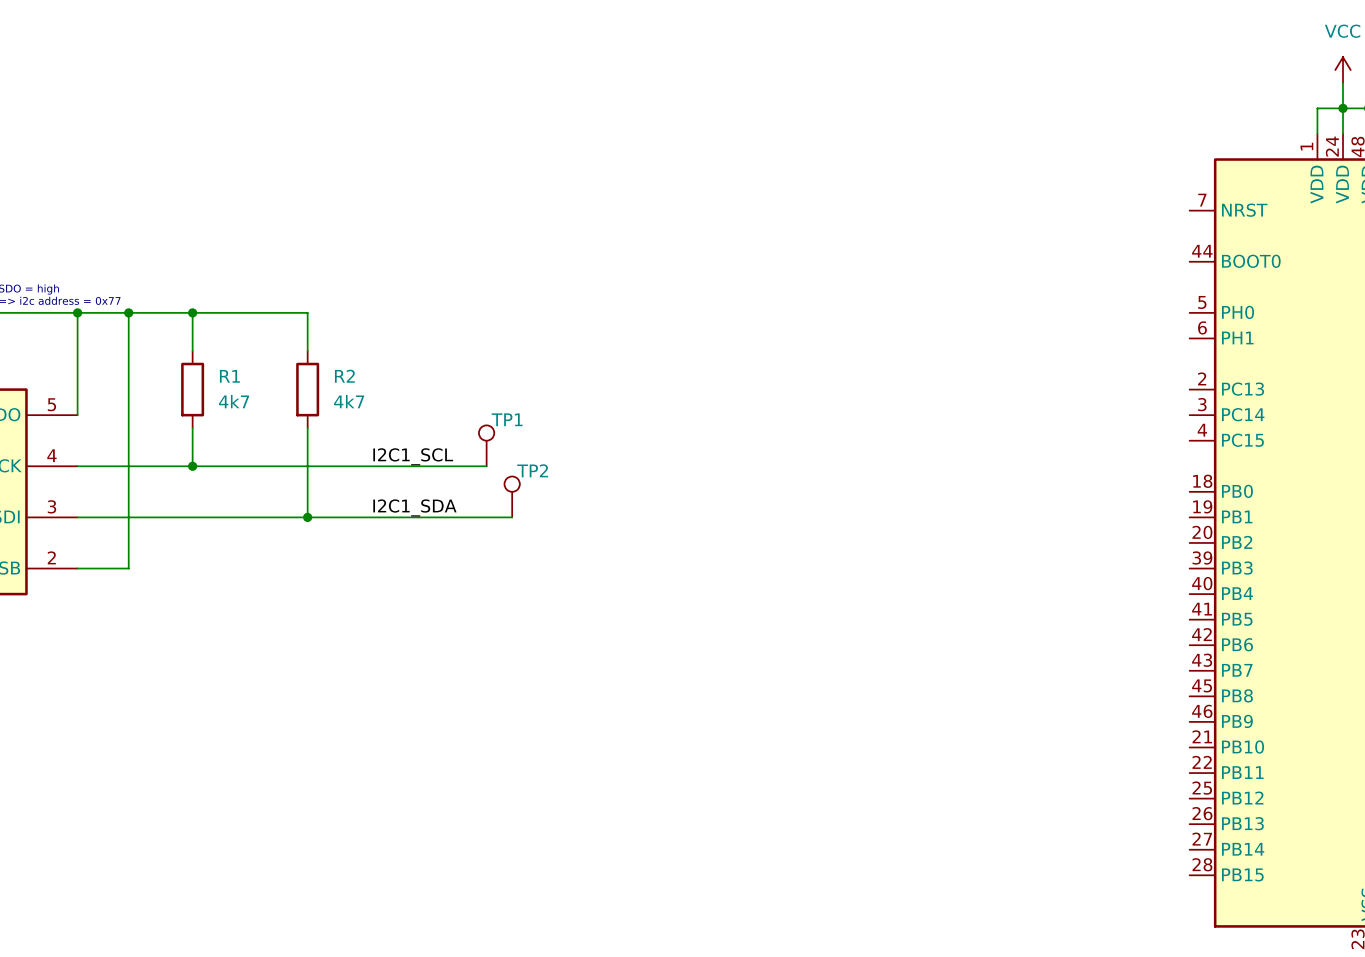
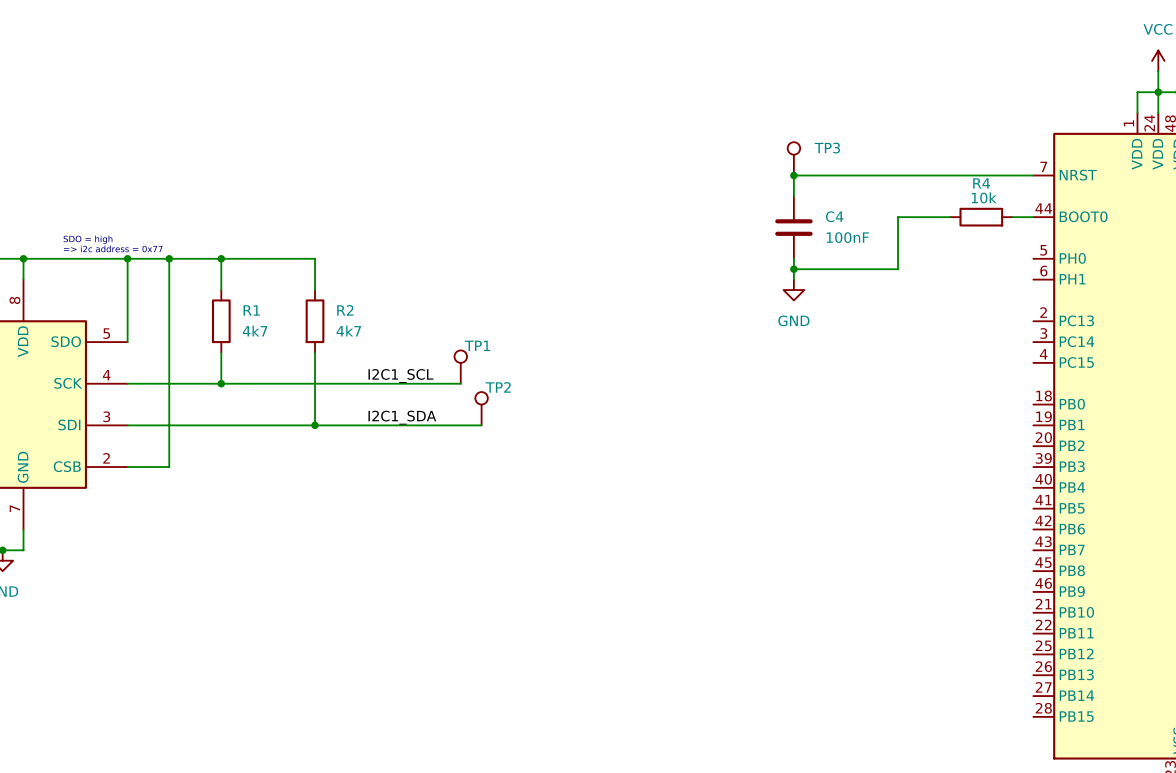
TP3: none -> (793, 158)
junction: none -> (793, 175)
wire: none -> (1033, 175) (793, 175) (793, 196)
wire: none -> (950, 217) (898, 217) (898, 269) (793, 269)
R4: none -> 10k (981, 217)
wire: none -> (1012, 217) (1033, 217)
C4: none -> 100nF (793, 227)
wire: none -> (793, 258) (793, 279)
junction: none -> (793, 269)
power symbol: none -> GND (793, 290)

